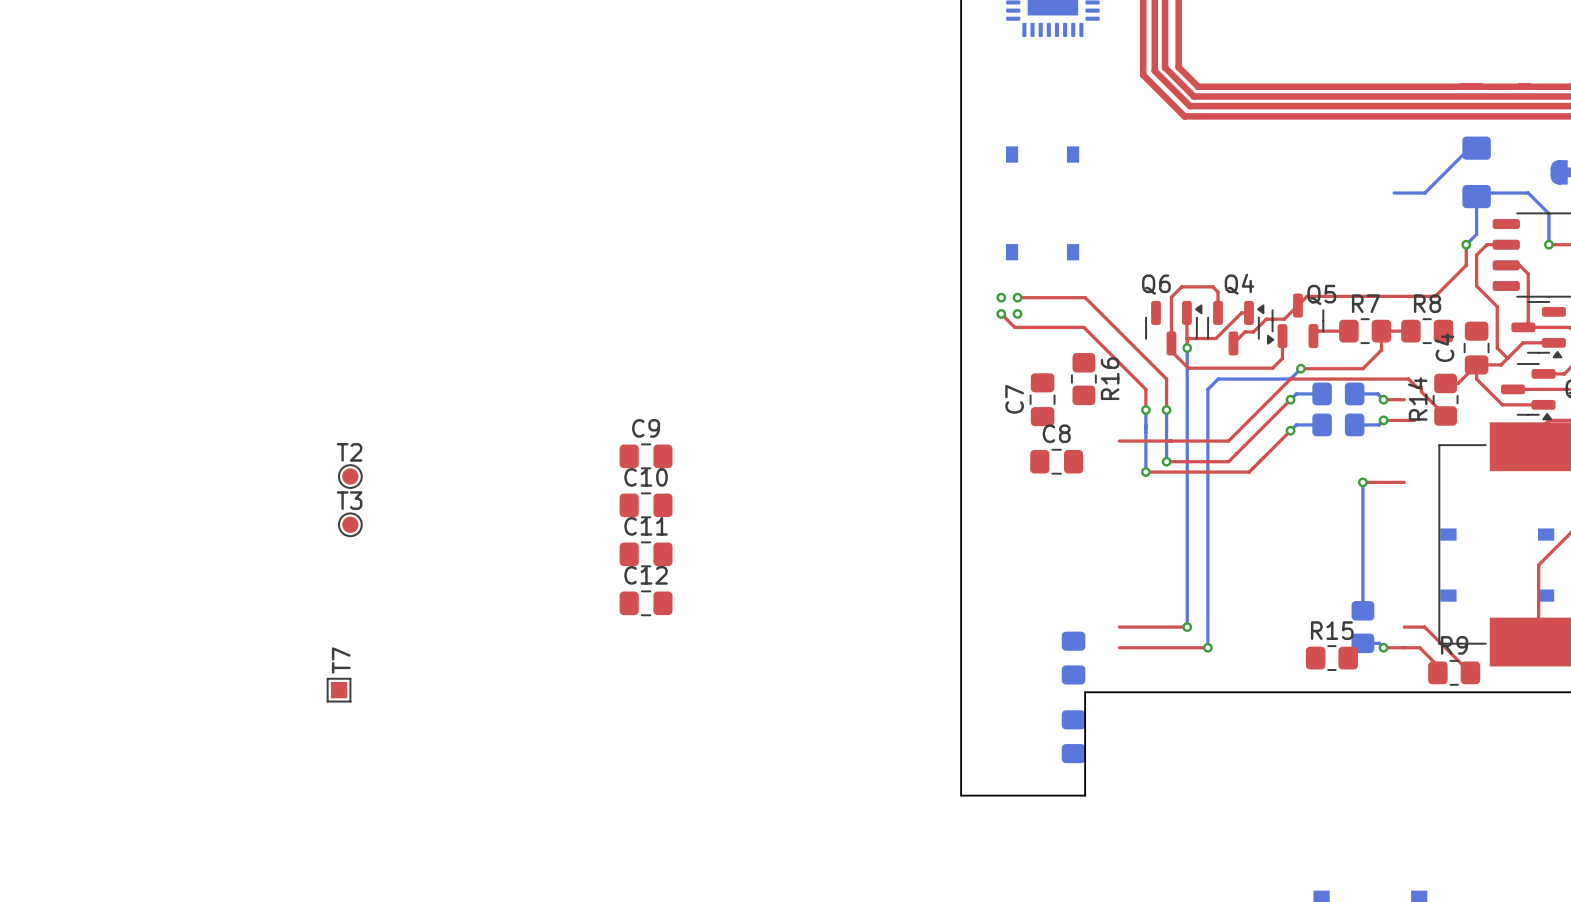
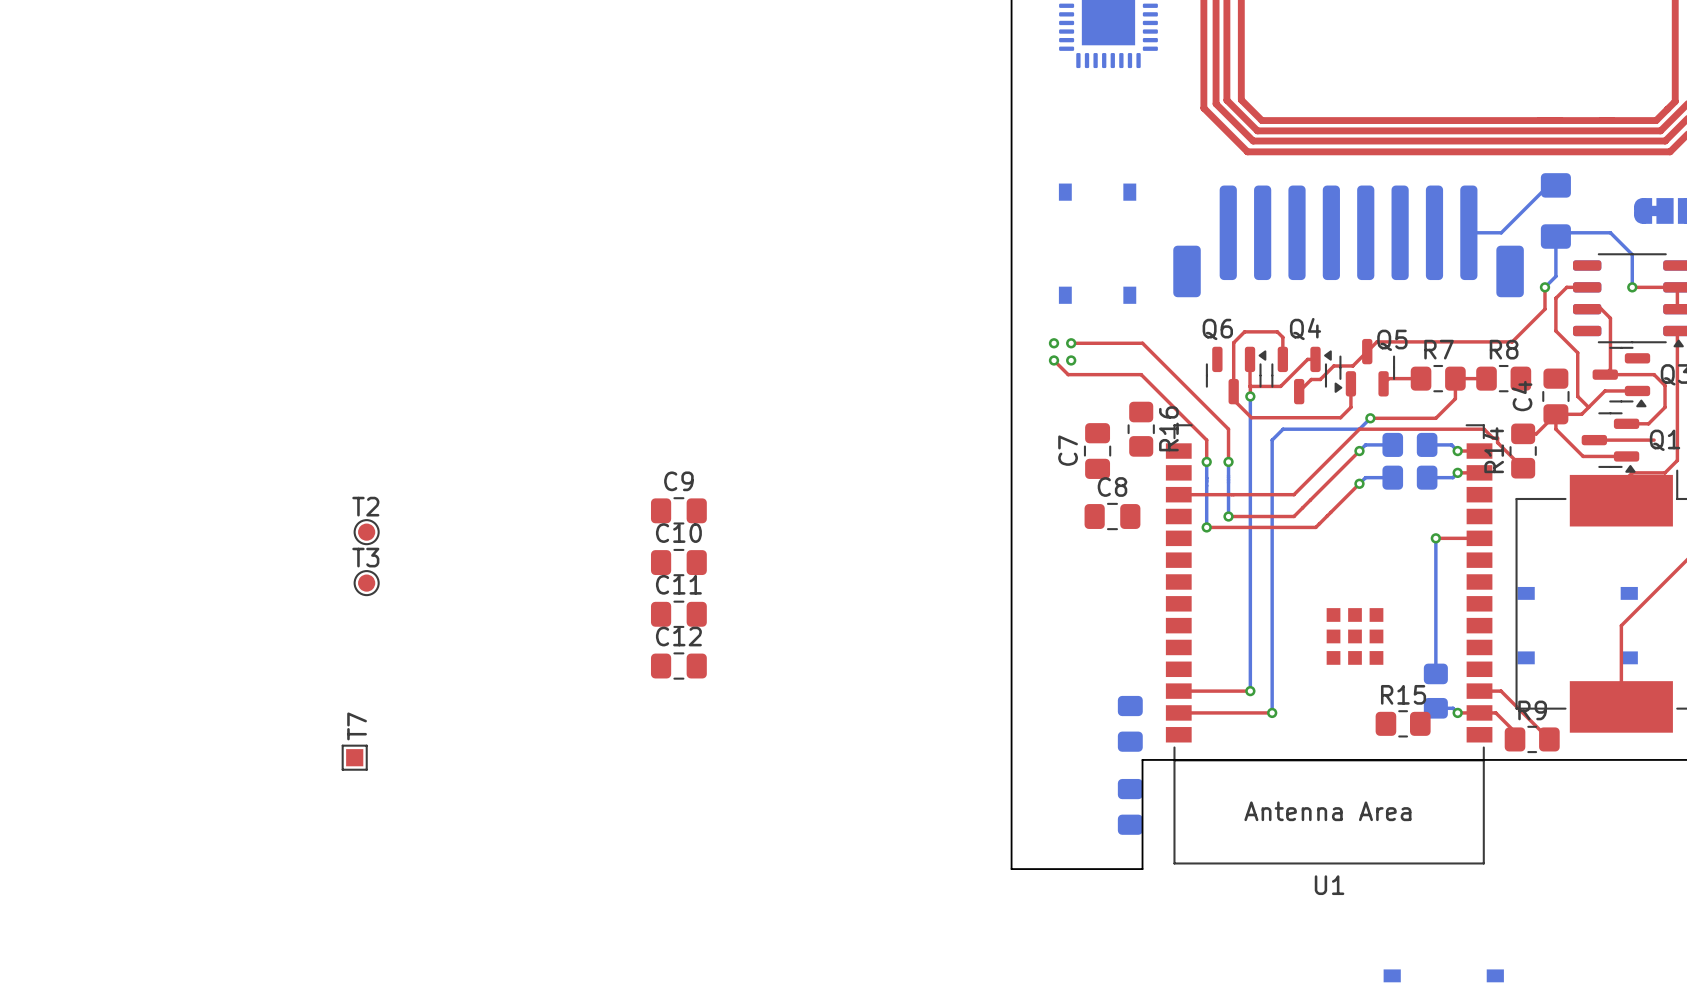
part: none -> (1348, 241)
U1: none -> (1329, 644)

